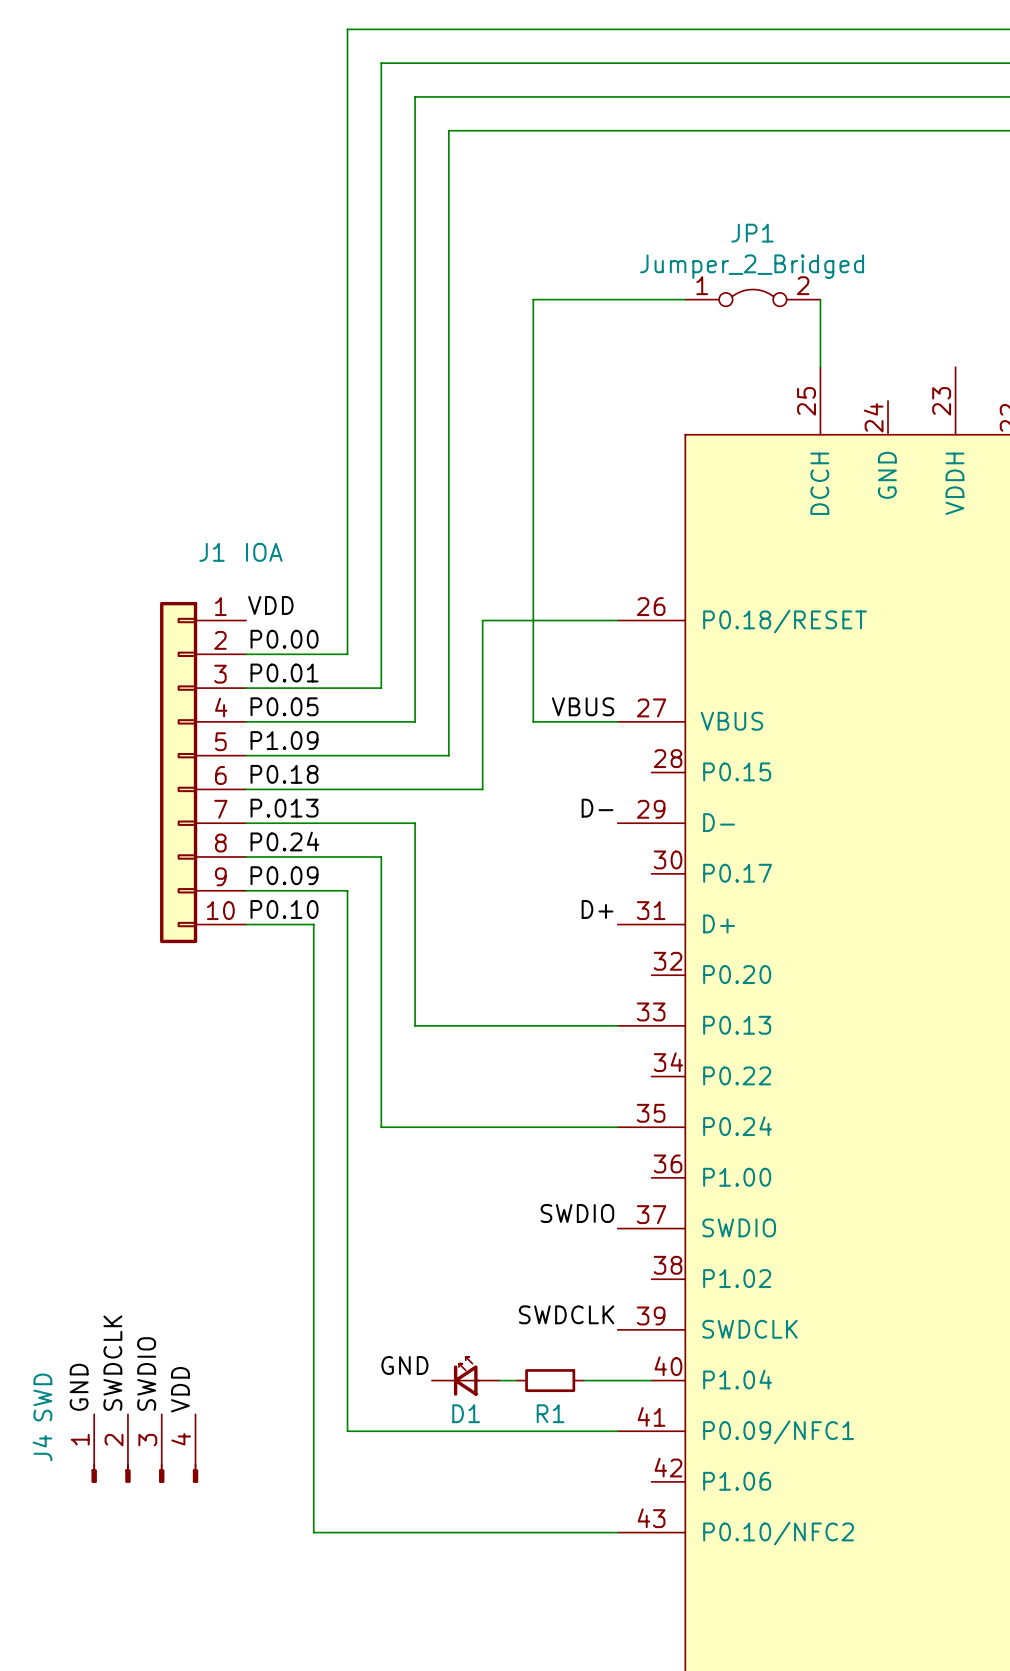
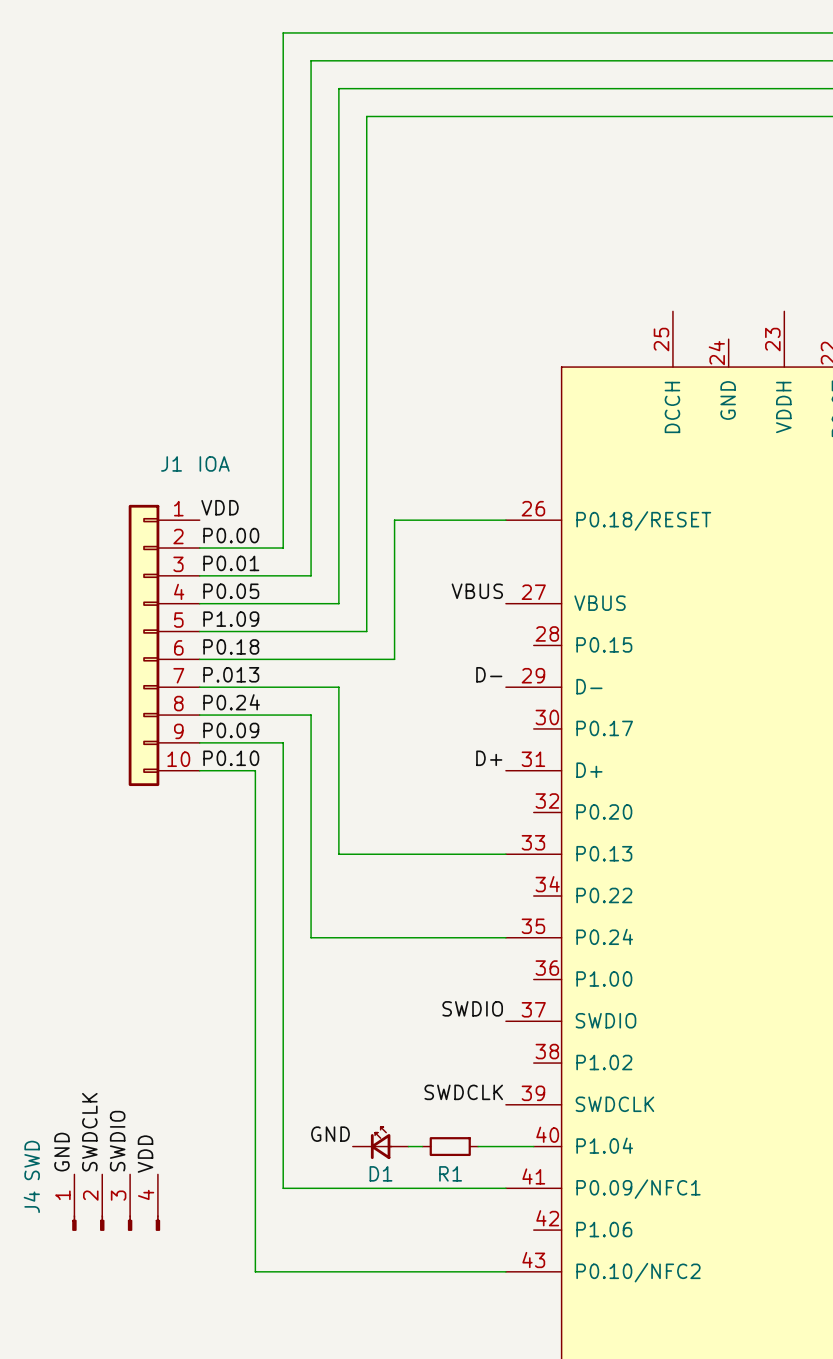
JP1: Jumper_2_Bridged (752, 297) -> none
wire: (685, 299) (533, 299) (533, 721) (617, 721) -> none
wire: (820, 299) (820, 367) -> none

